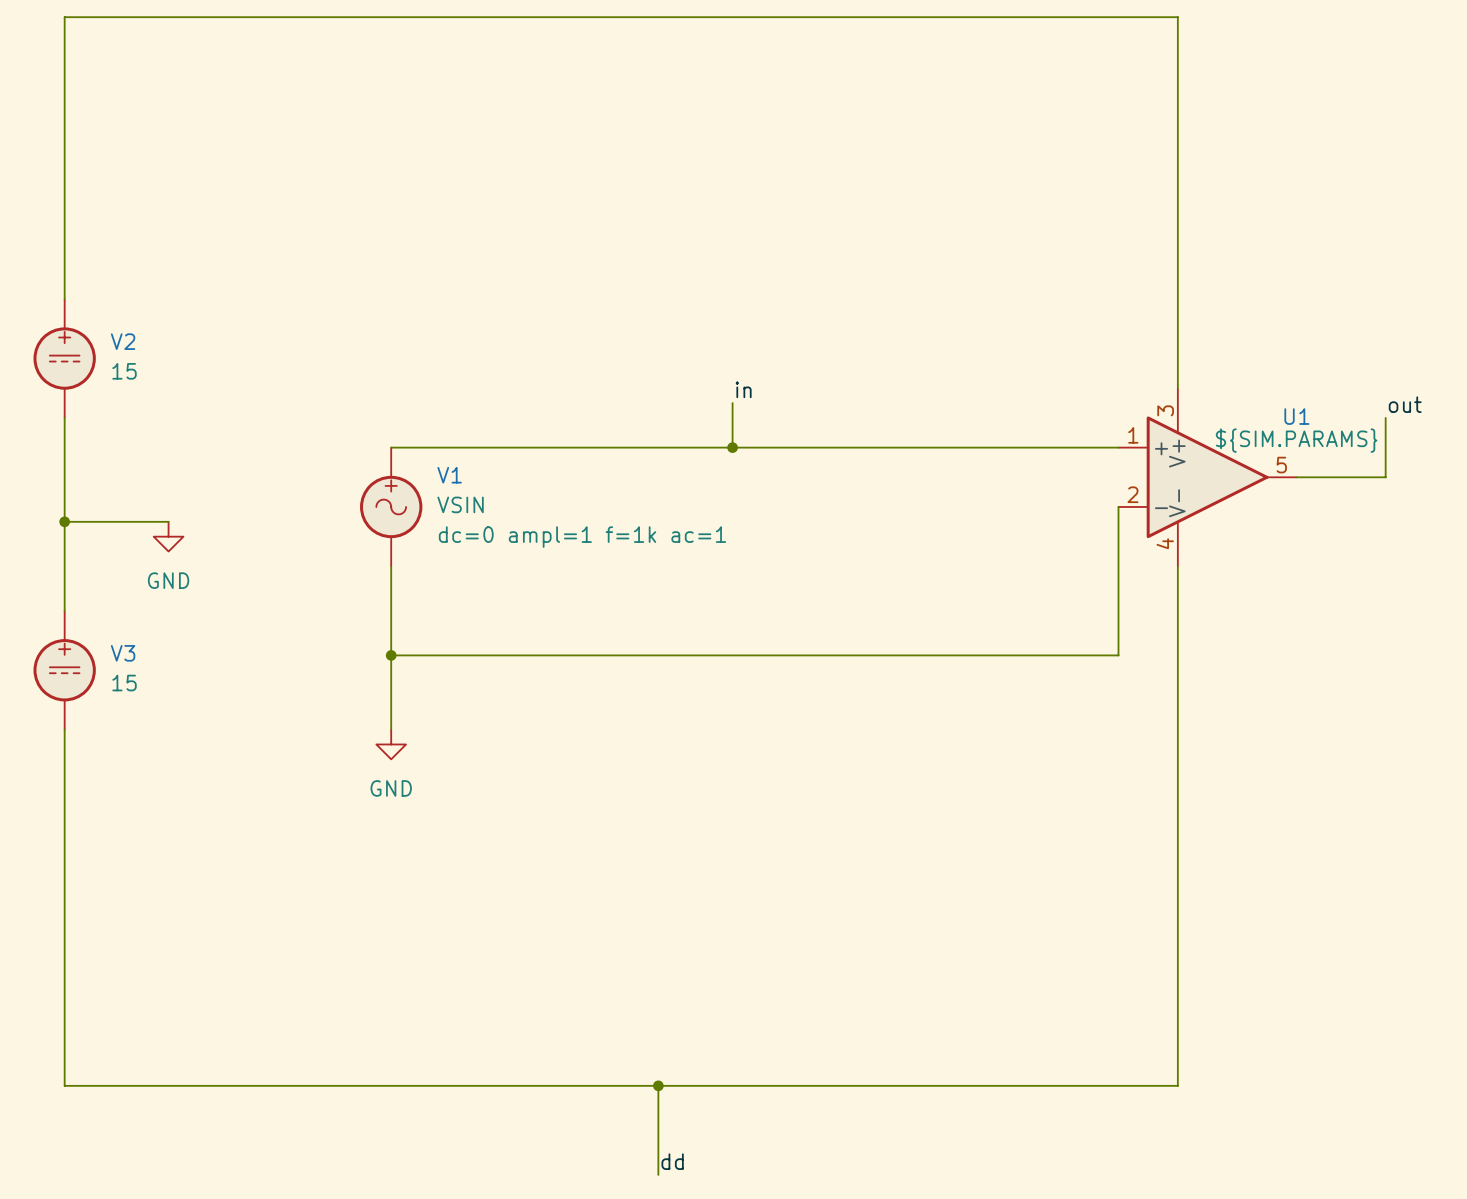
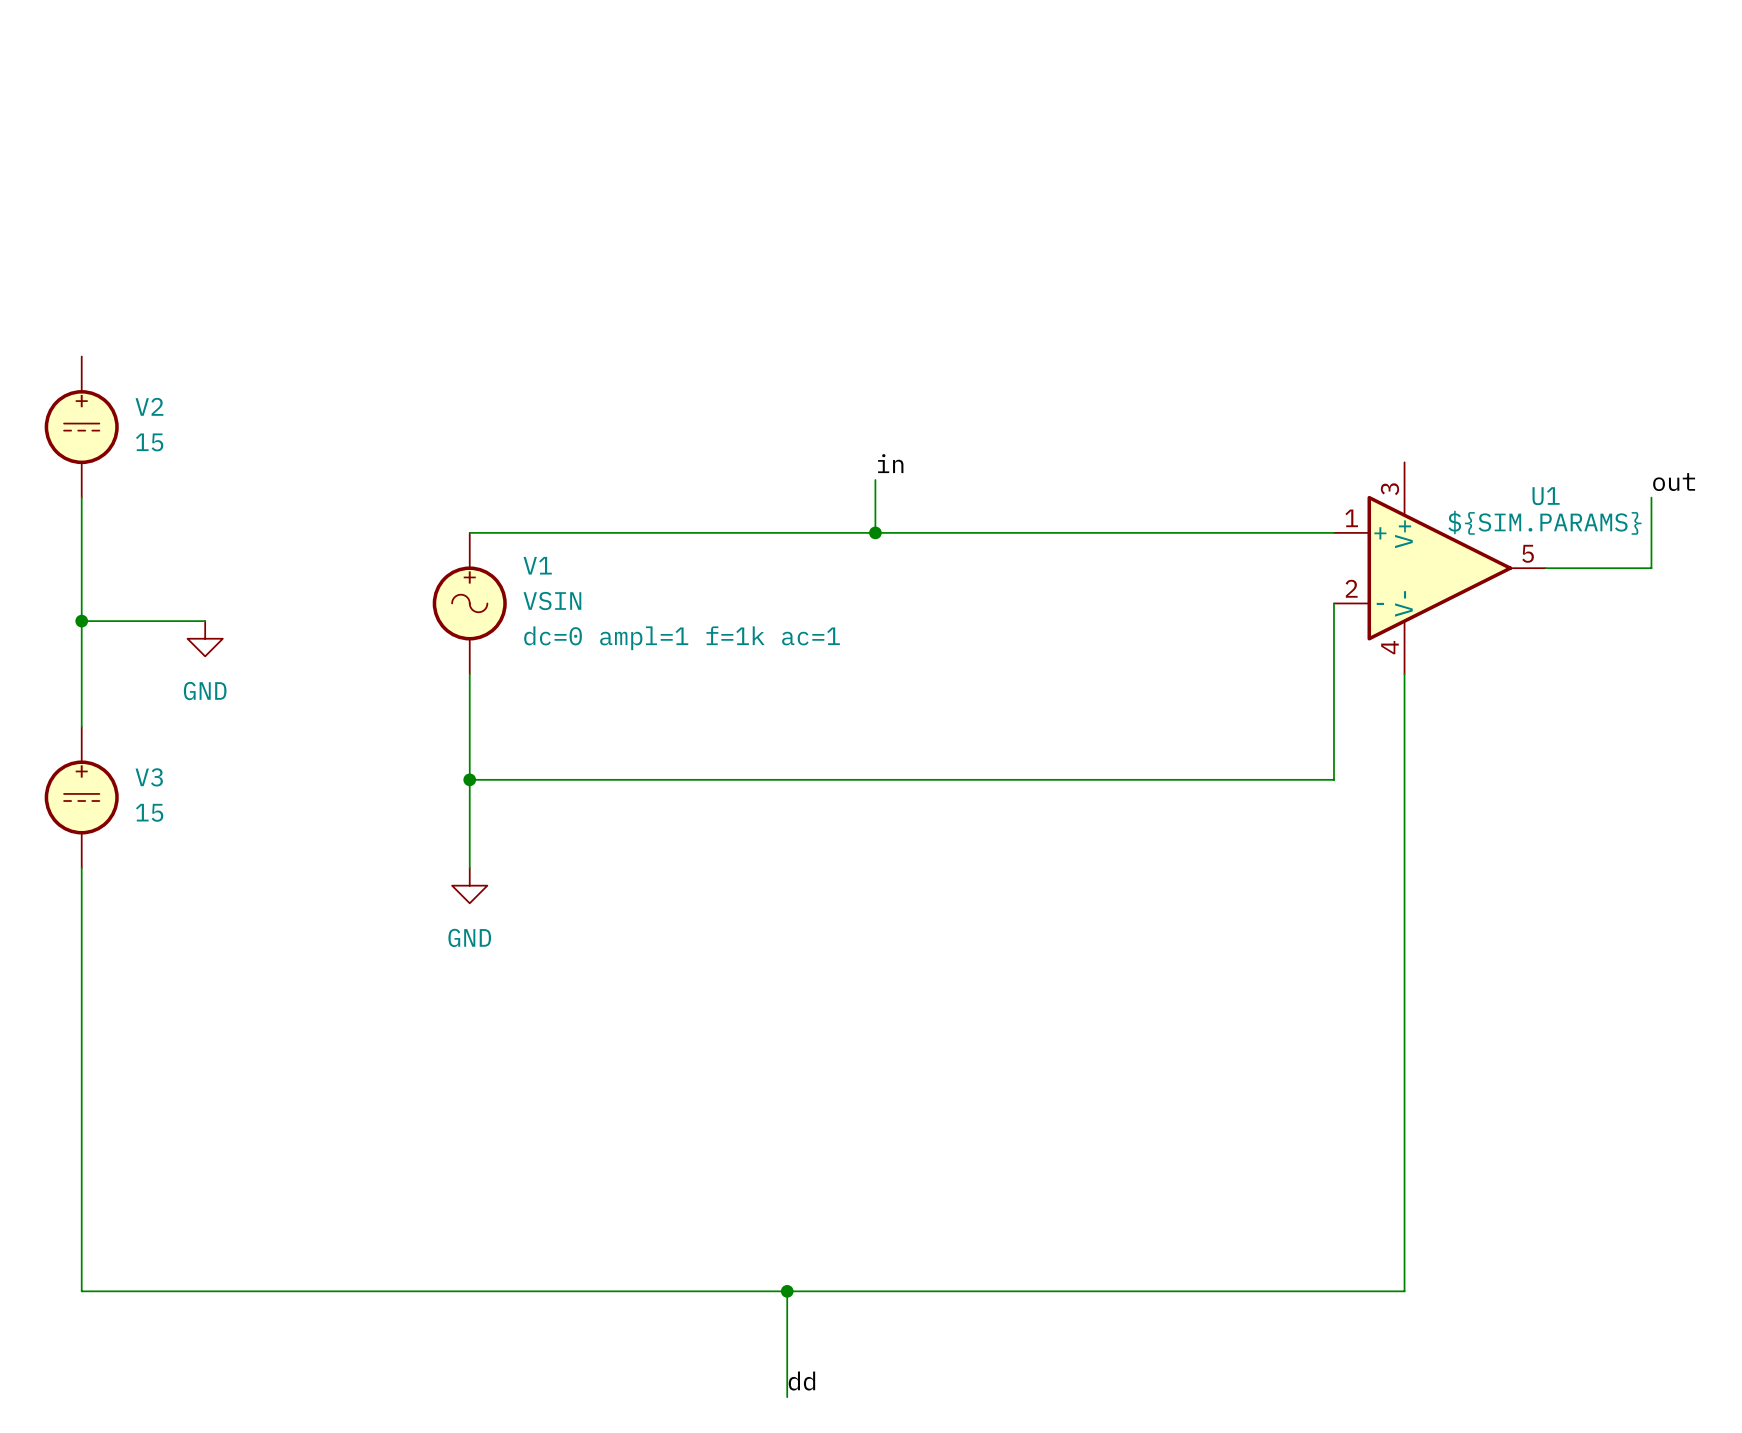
wire: (64, 299) (64, 17) (1177, 17) (1177, 388) -> none

